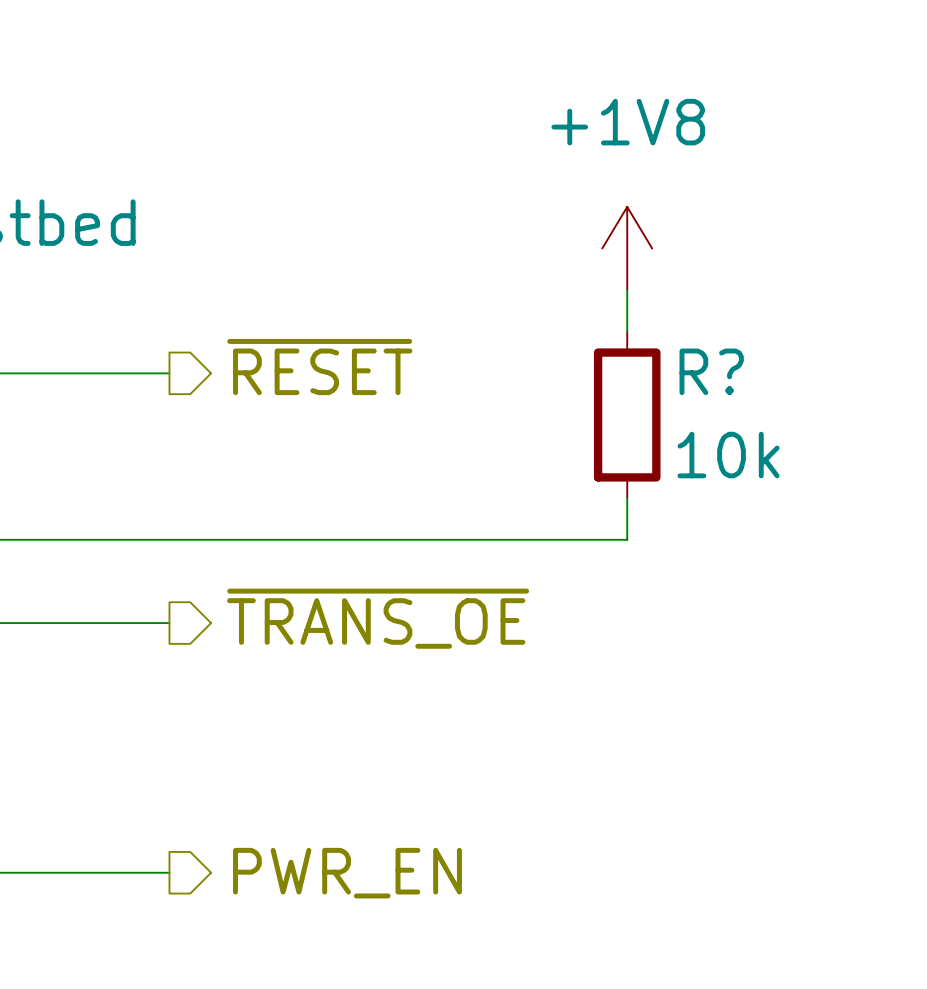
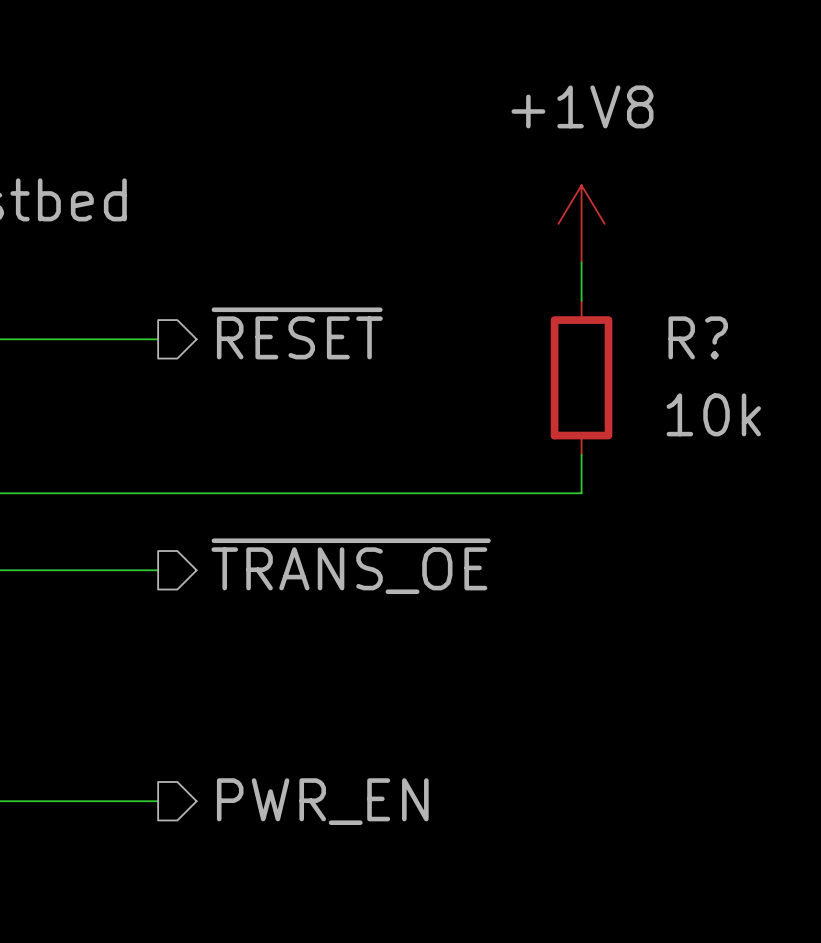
R? name position: R? (711, 371) -> R? (698, 337)
R? text position: 10k (728, 455) -> 10k (713, 414)

